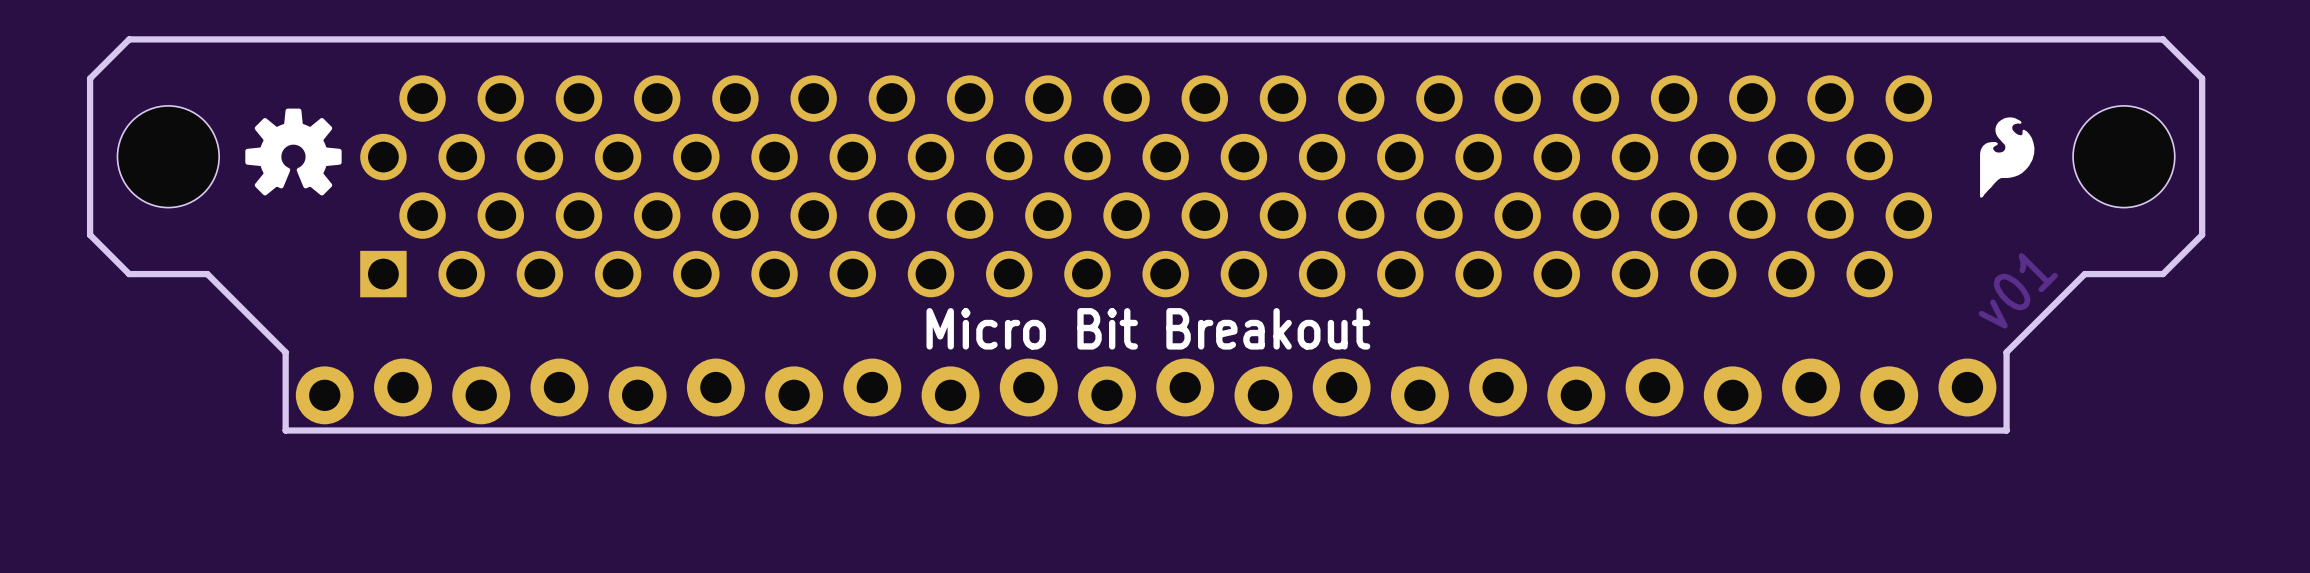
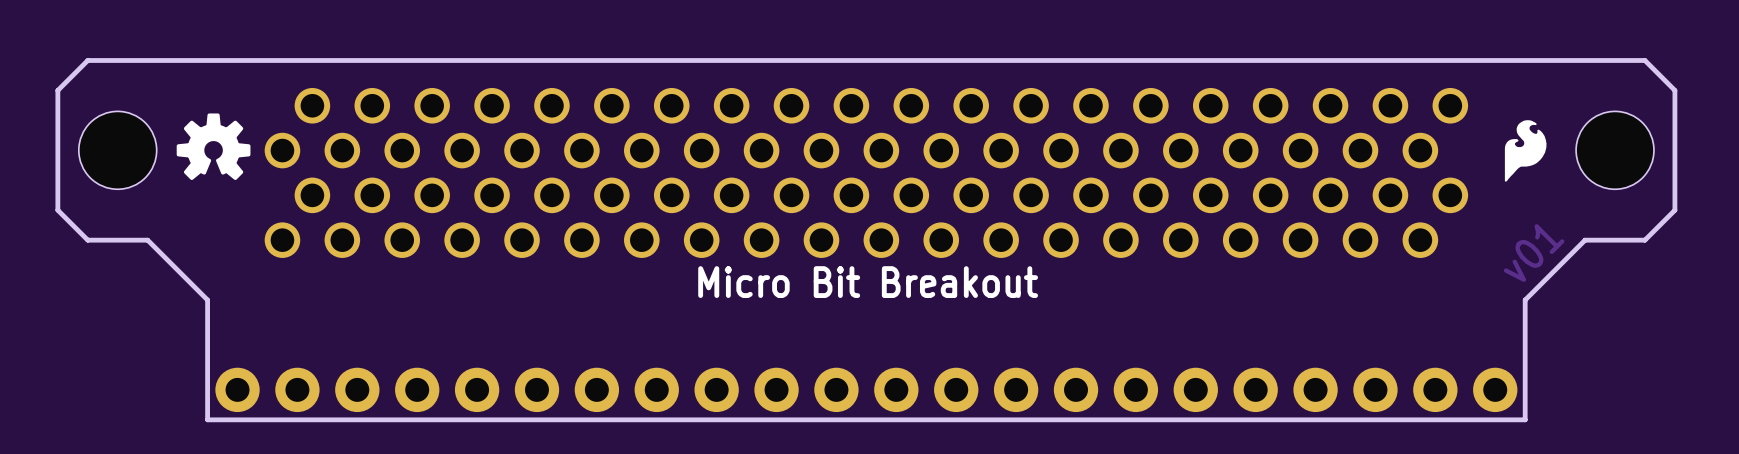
part footprint: [360, 75, 1933, 298] -> [264, 87, 1469, 258]
part: (1146, 391) -> none
board edge: (2006, 430) (285, 430) -> (1525, 359) (1525, 419) (207, 419) (207, 359)
part: none -> (866, 389)

